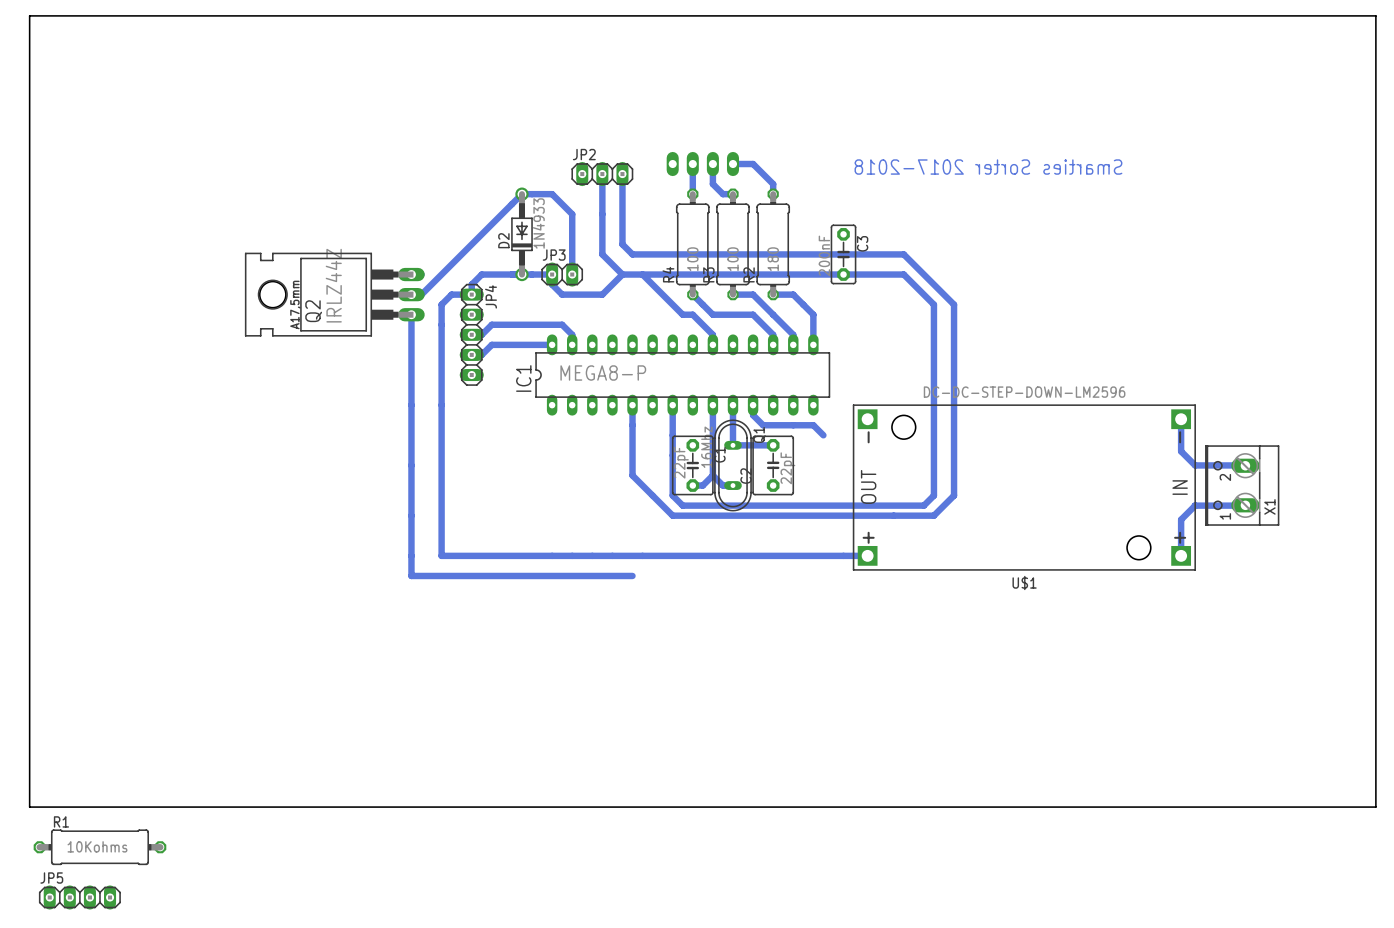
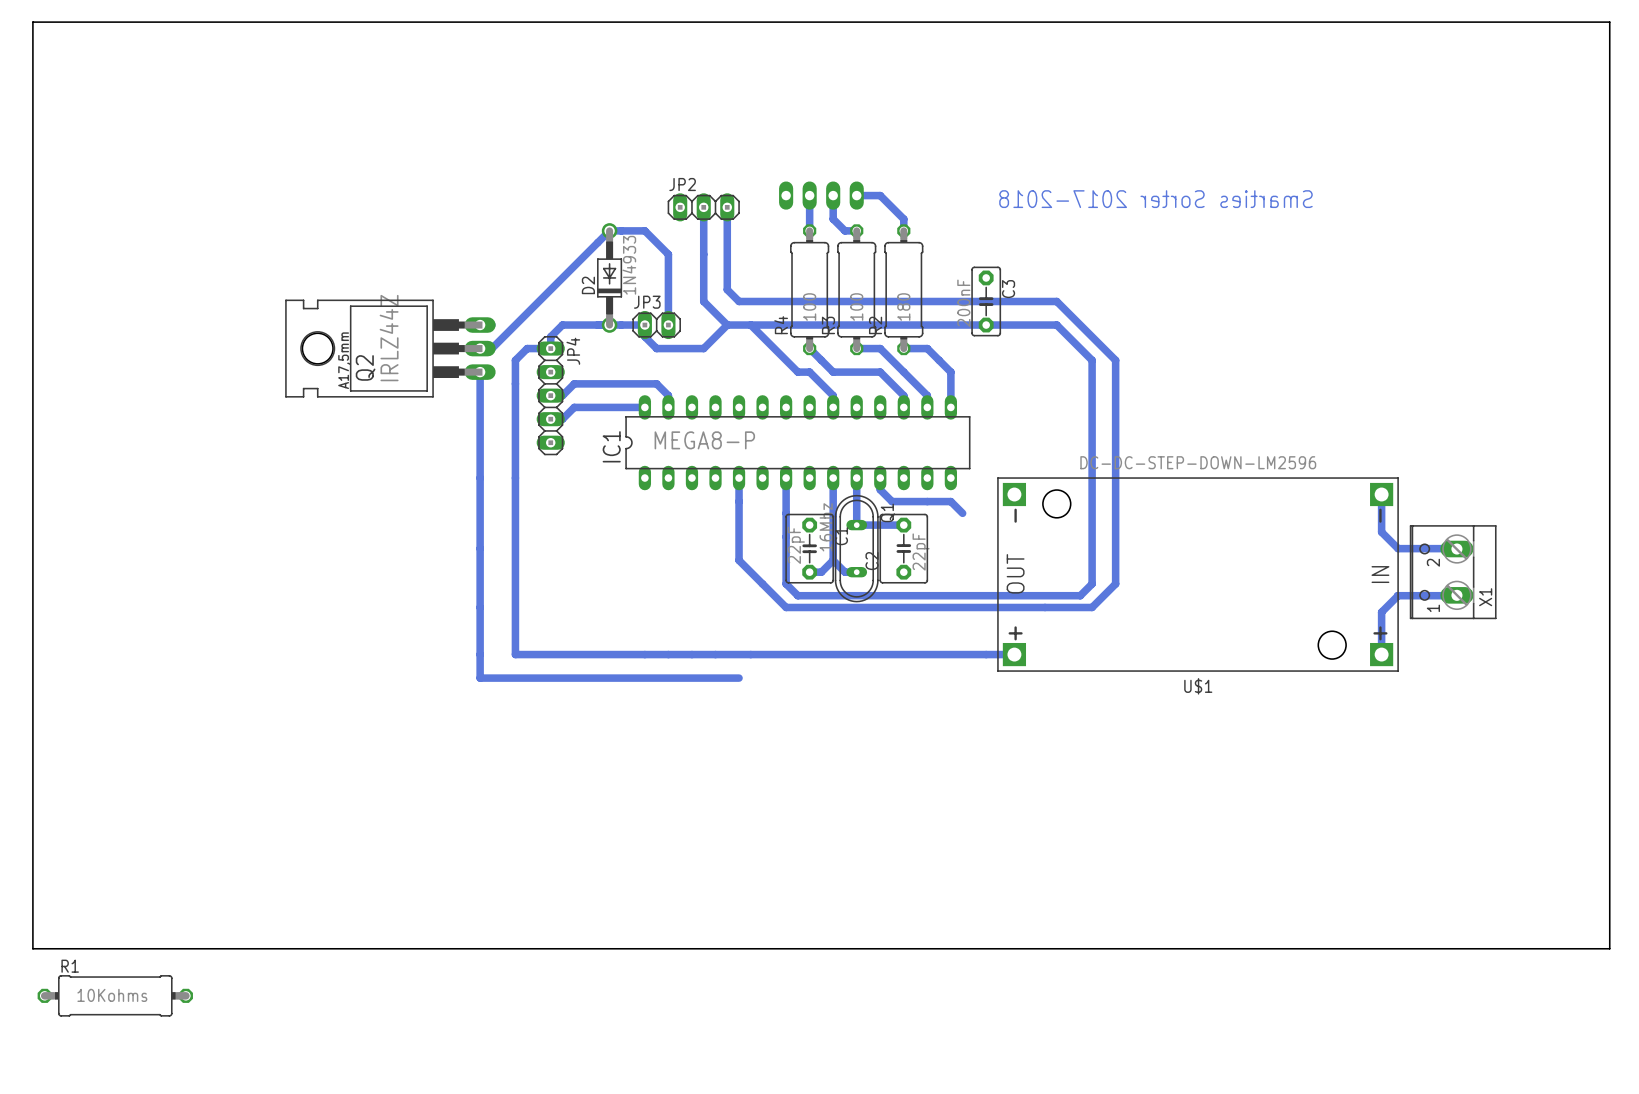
JP5: (79, 897) -> none

